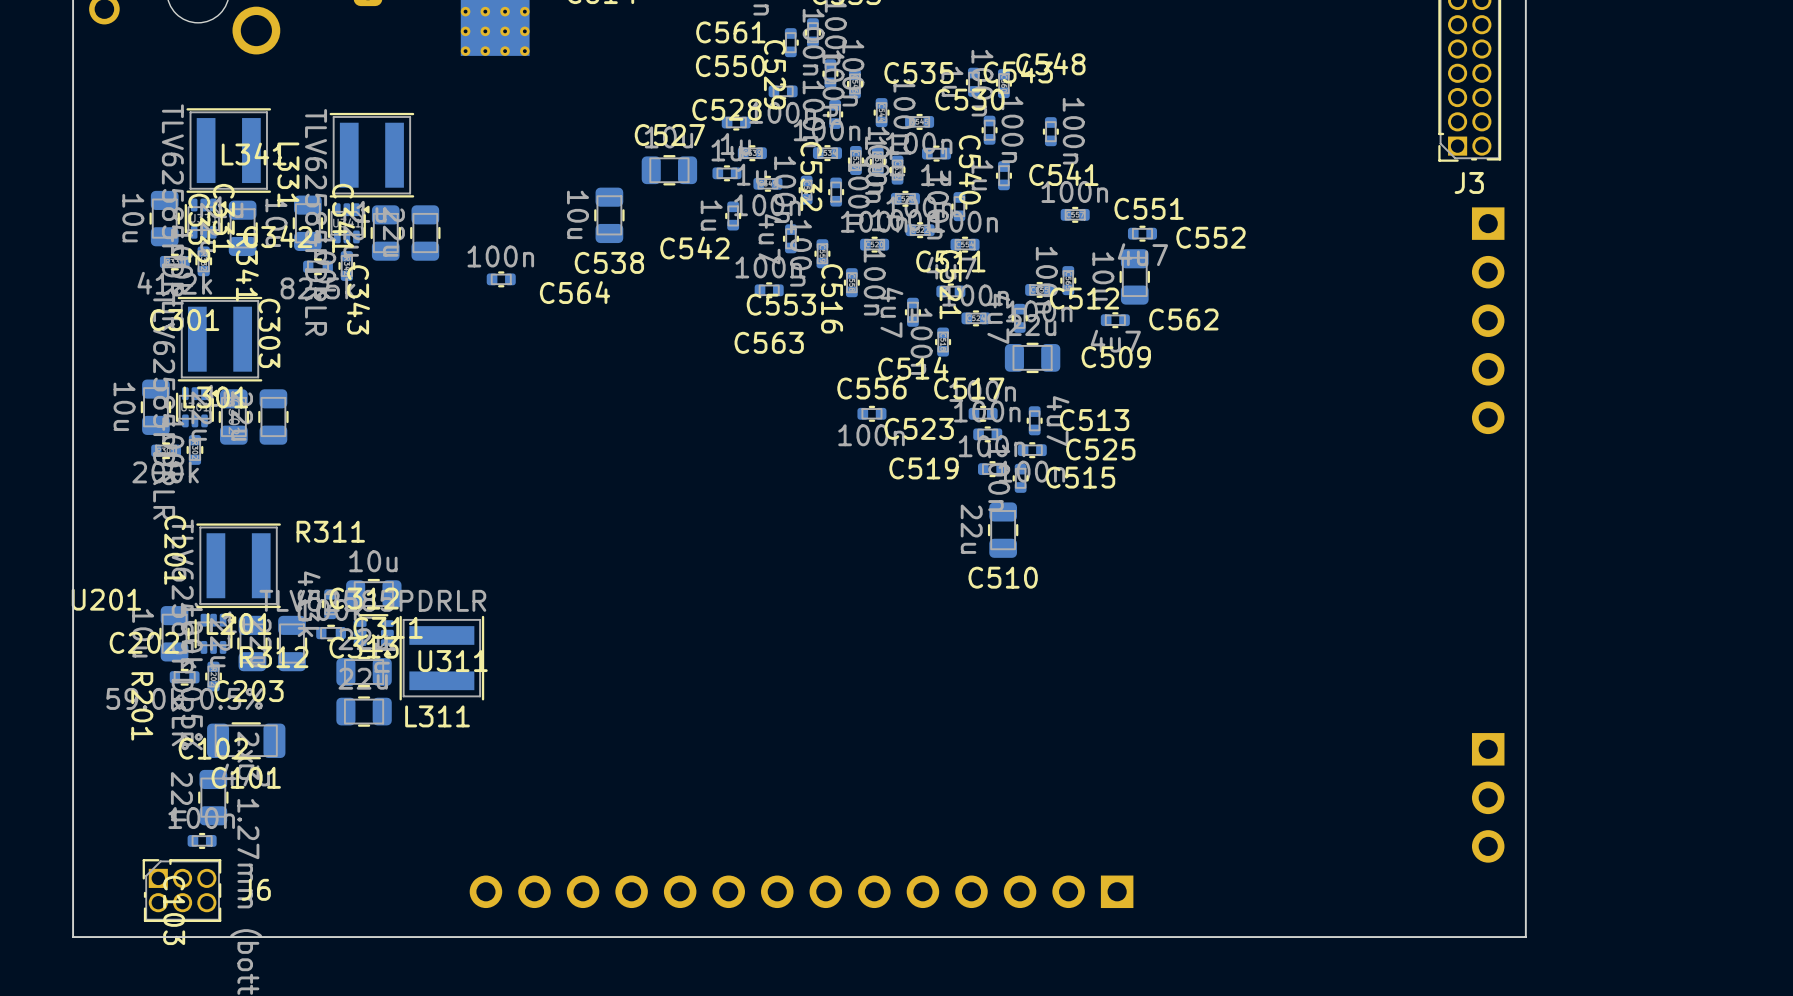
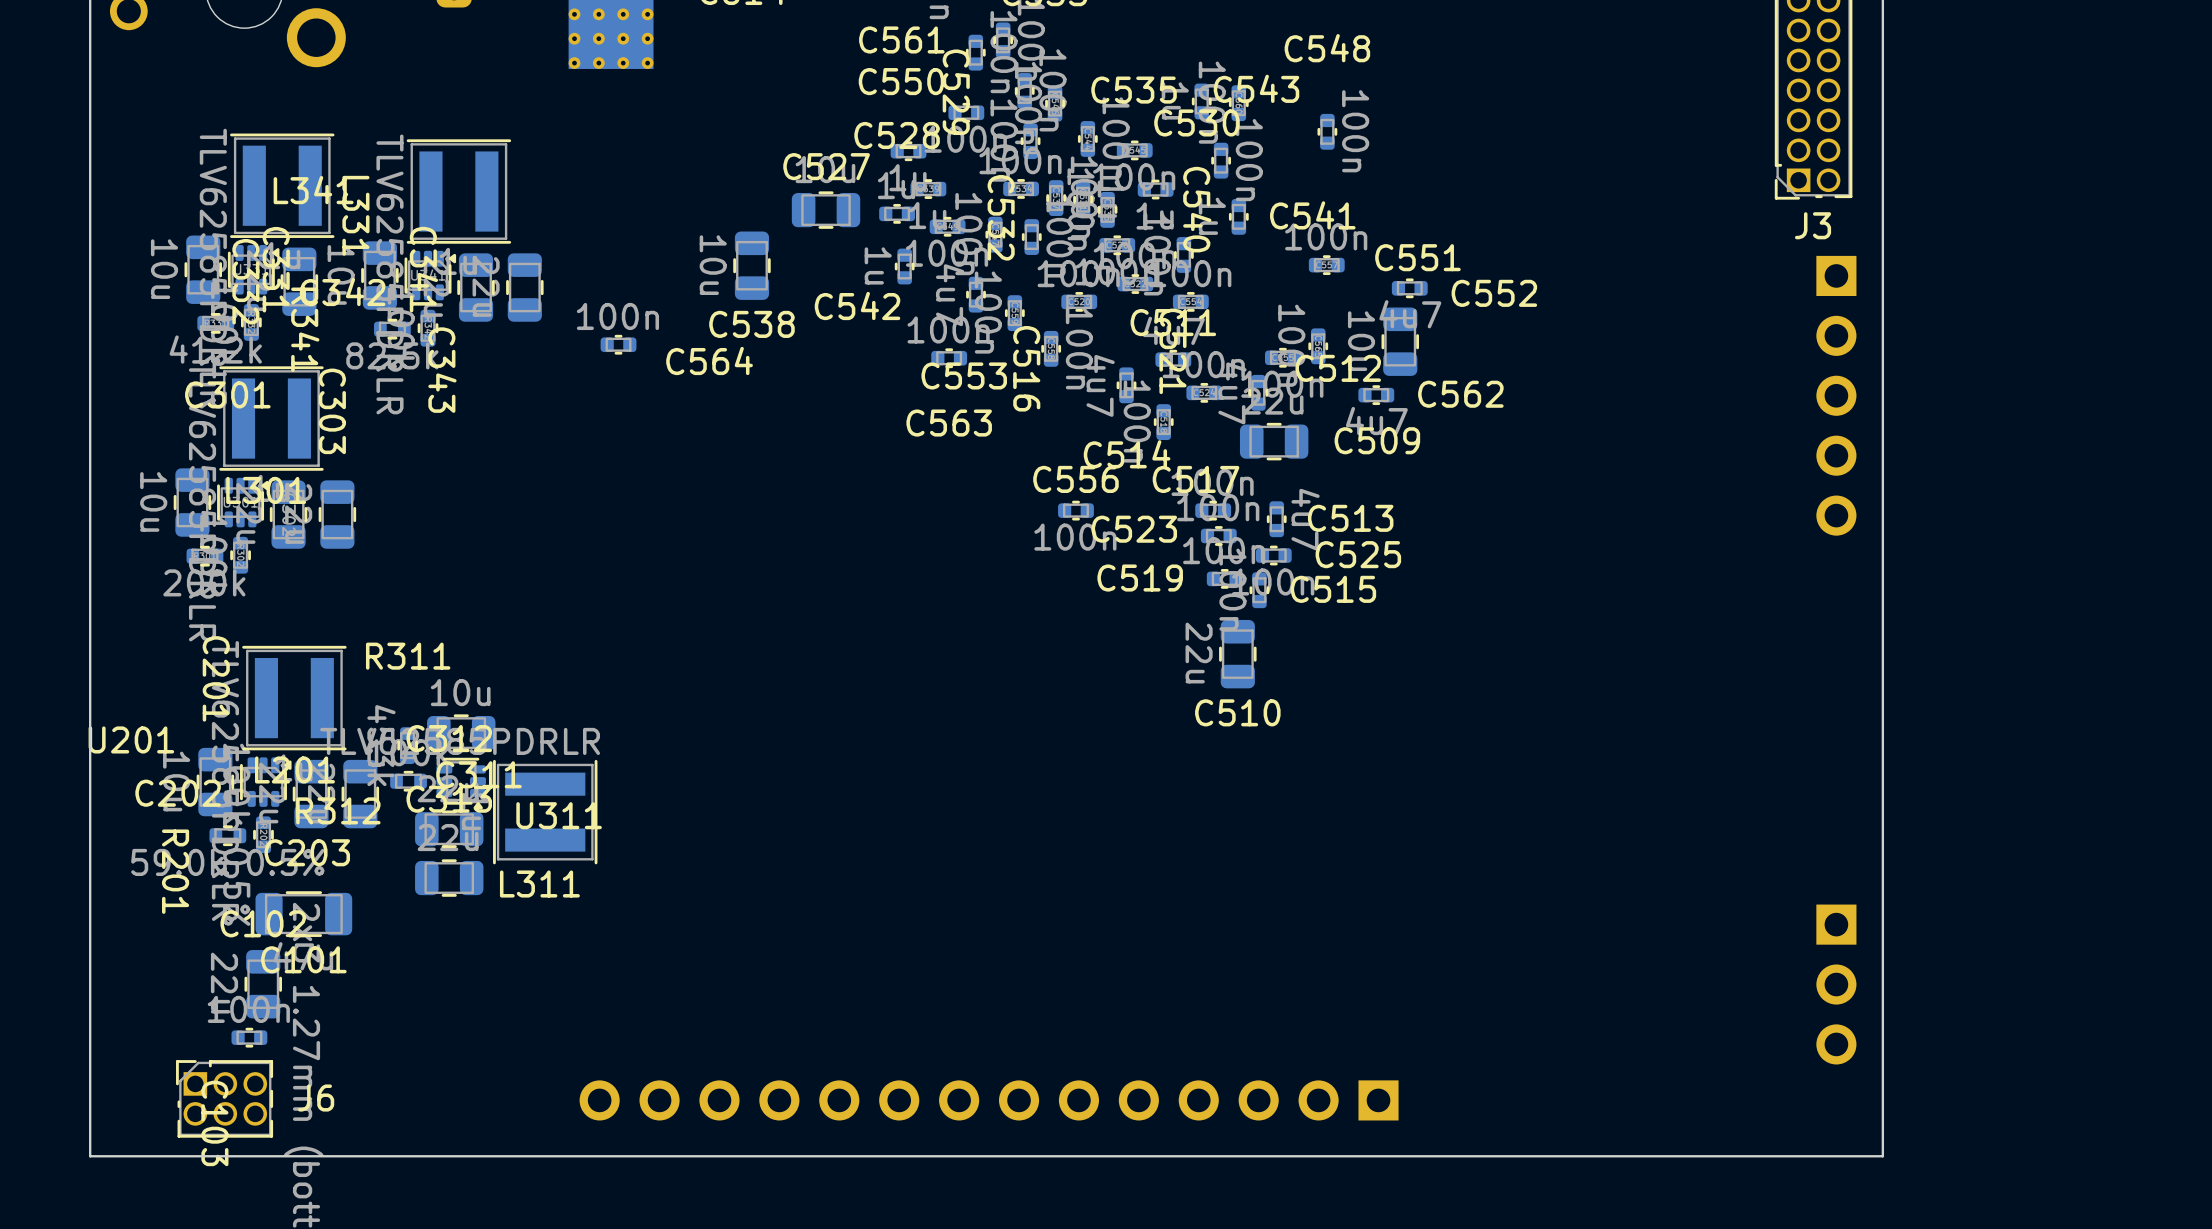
C548 position: (1050, 131) -> (1327, 131)

